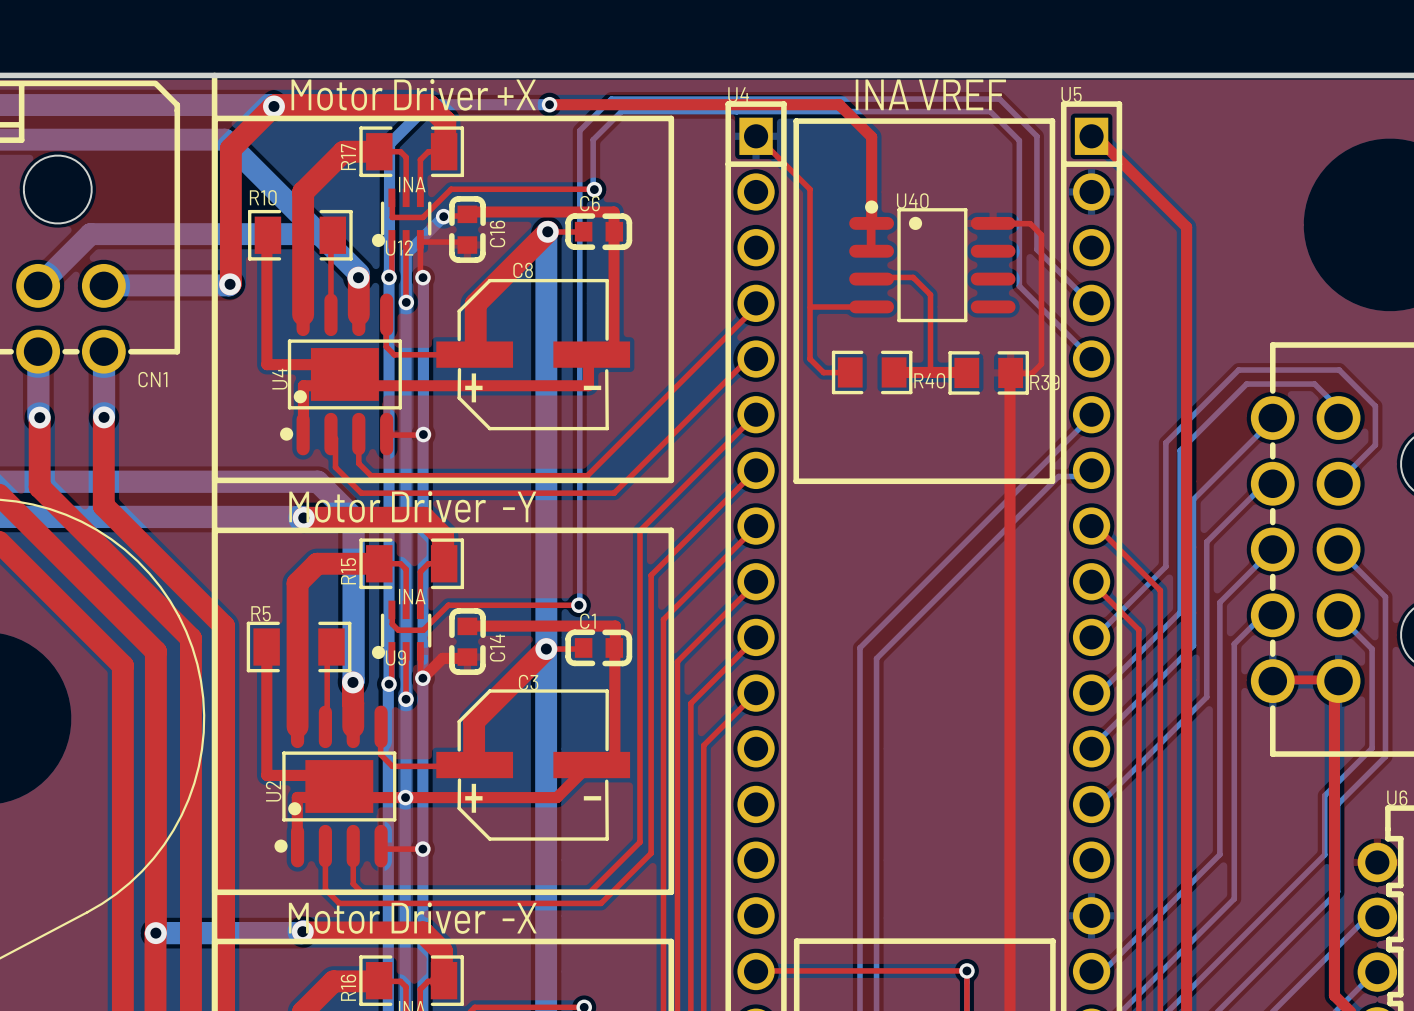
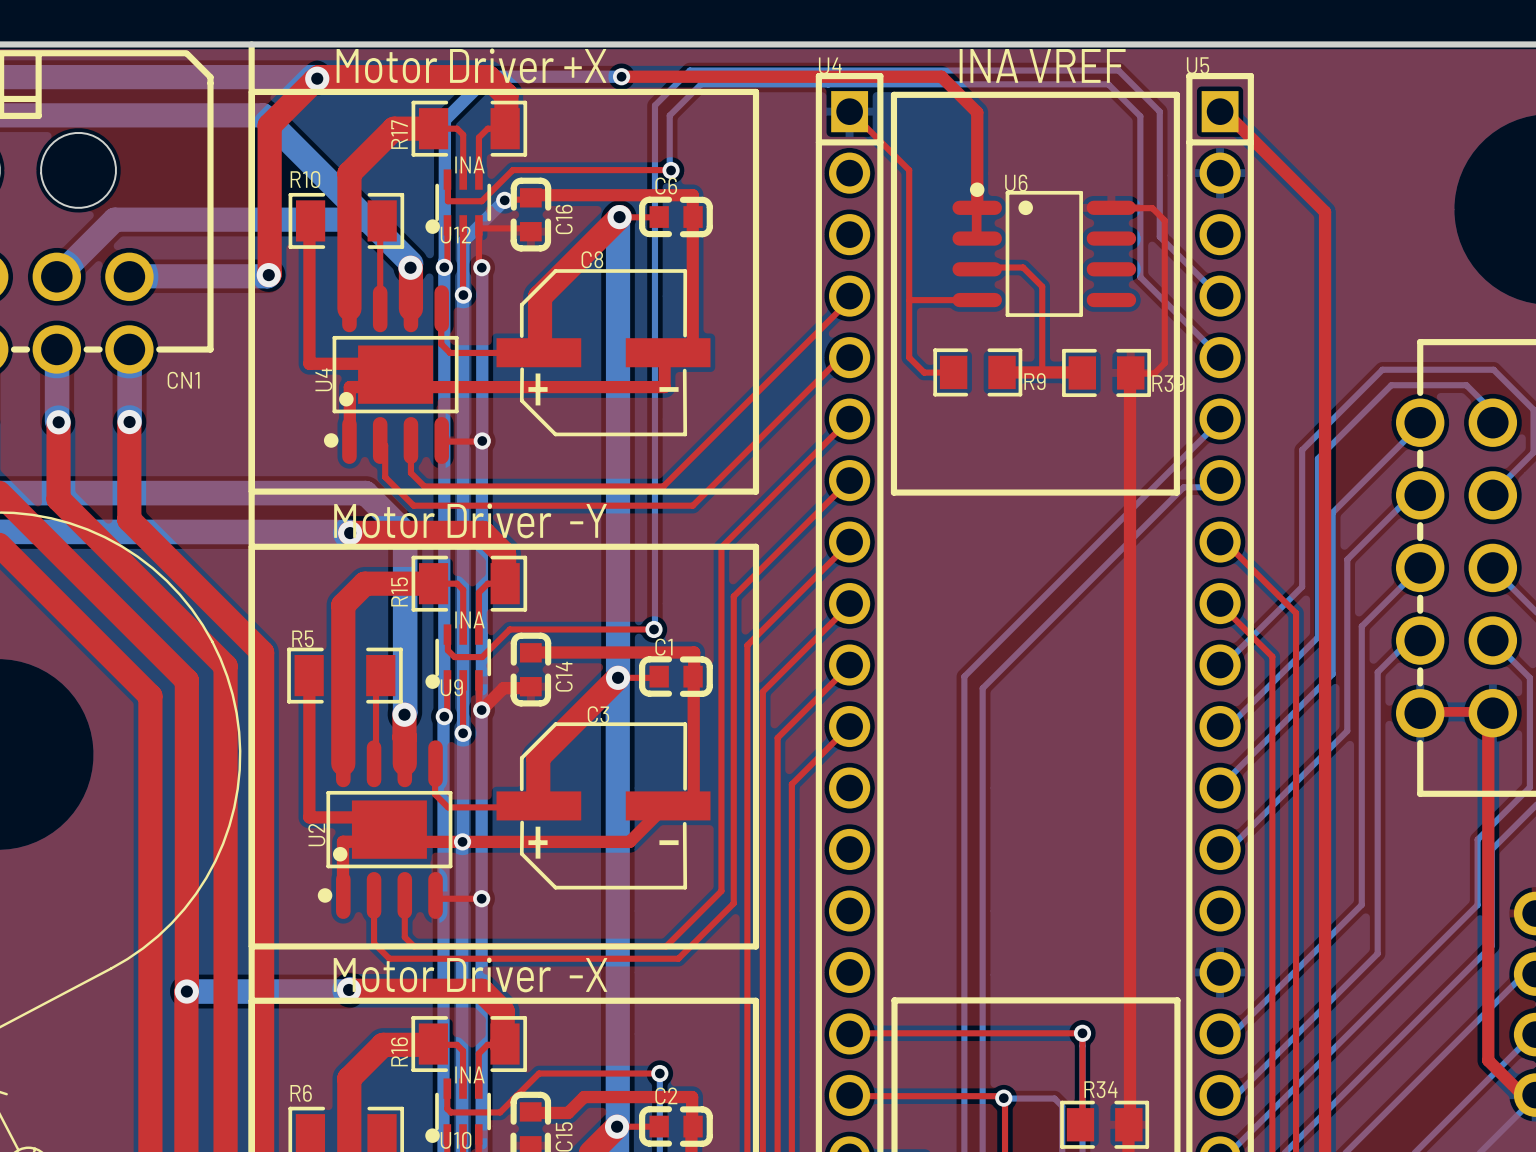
U40 name: U40 (912, 200) -> U6 (1016, 183)
R40 name: R40 (929, 380) -> R9 (1034, 381)

